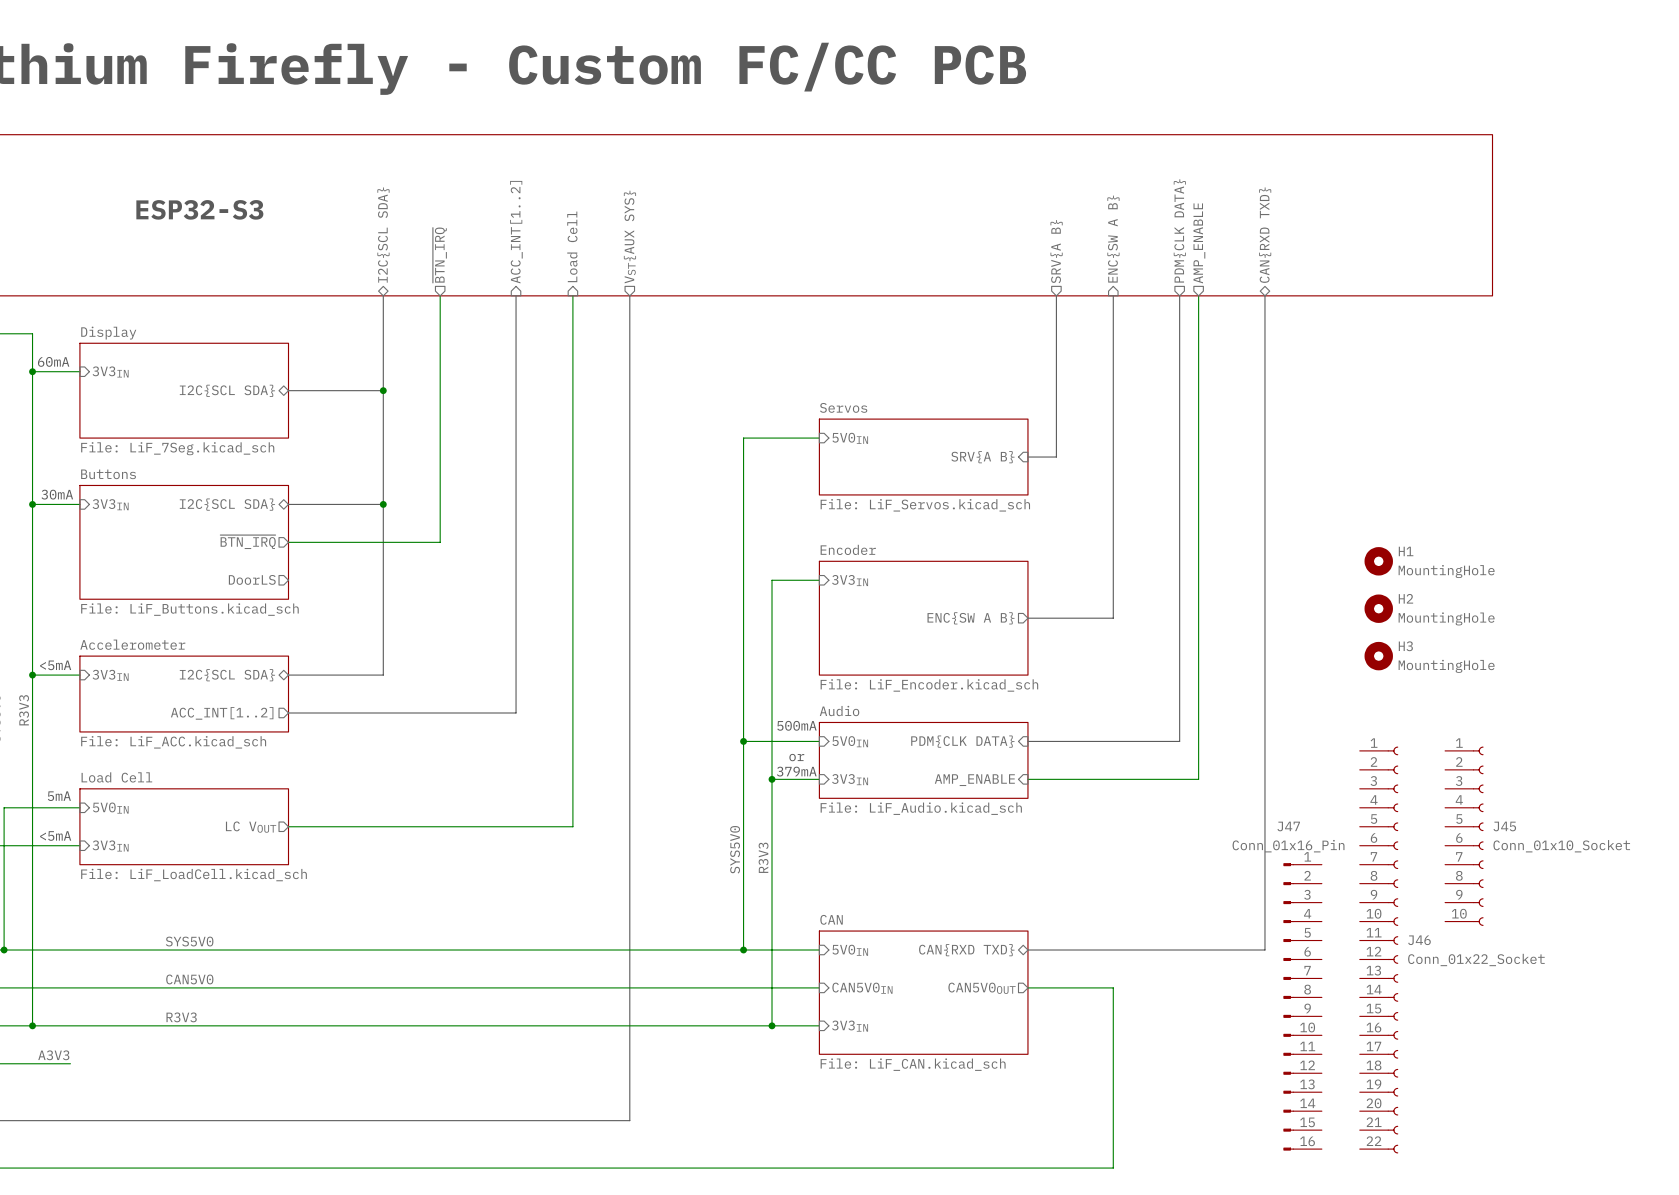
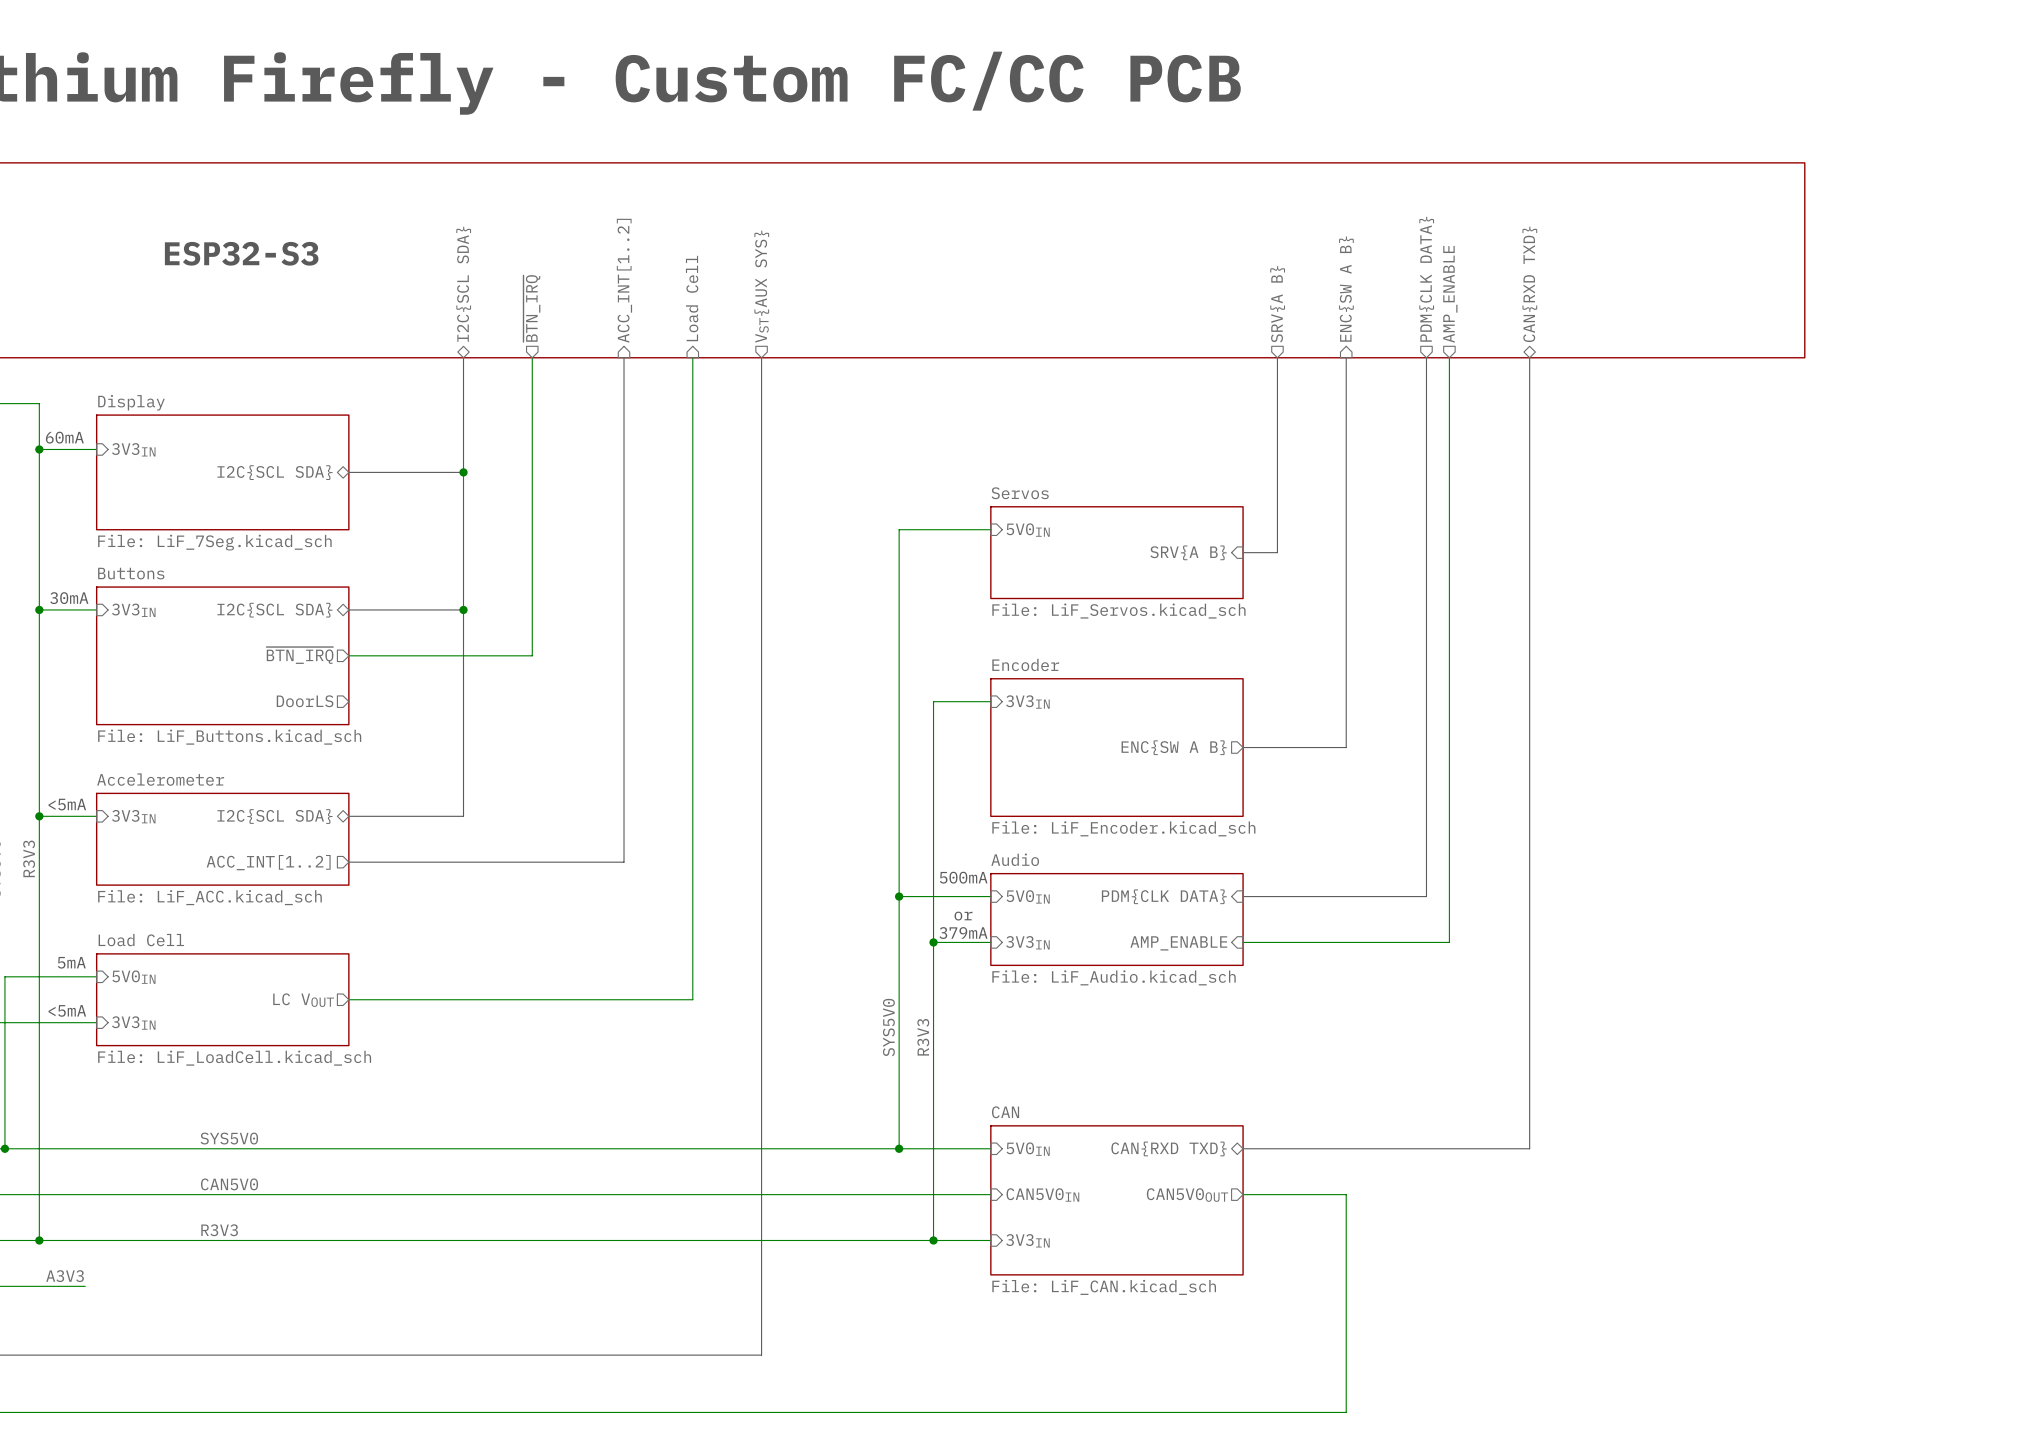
H1: MountingHole (1378, 561) -> none
H2: MountingHole (1378, 608) -> none
H3: MountingHole (1378, 656) -> none
J45: Conn_01x10_Socket (1464, 836) -> none
J46: Conn_01x22_Socket (1379, 950) -> none
J47: Conn_01x16_Pin (1302, 1006) -> none

